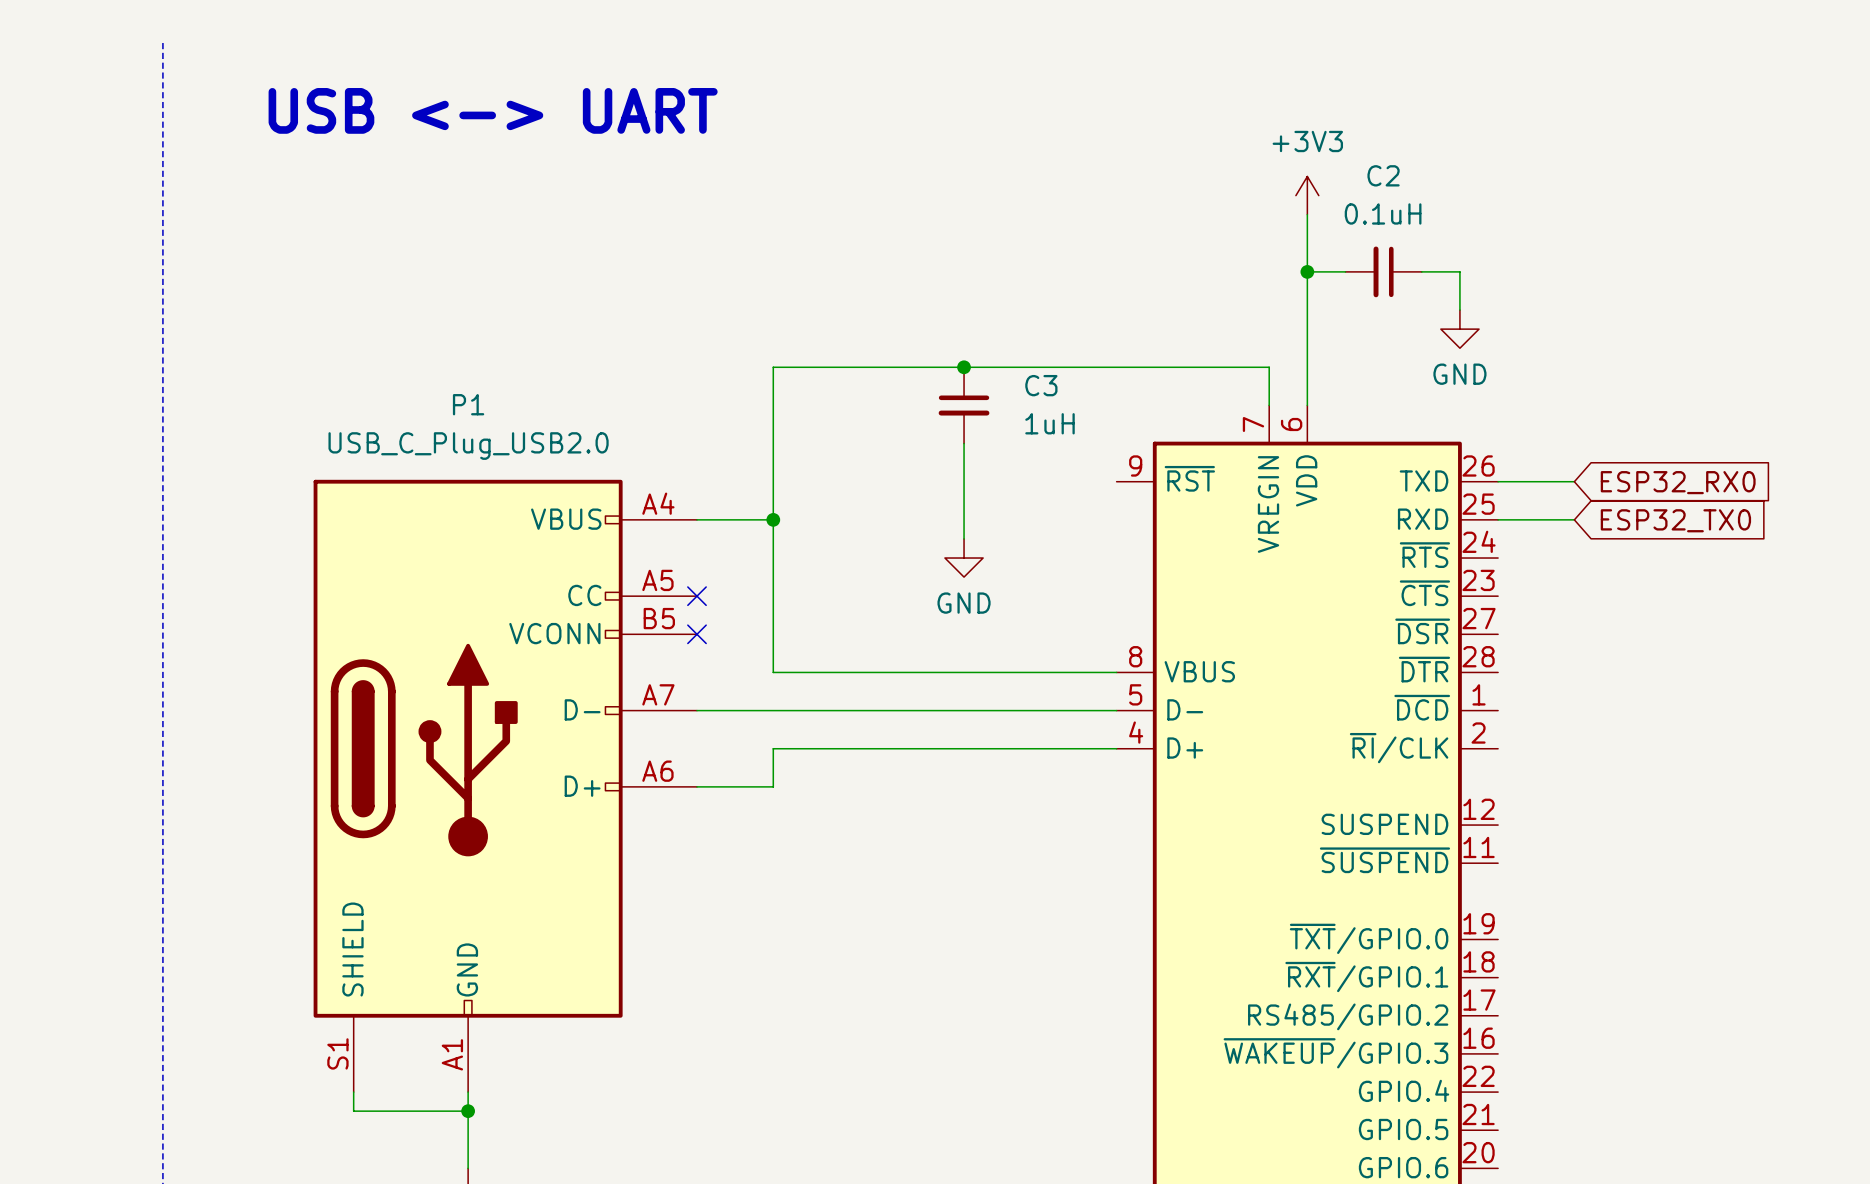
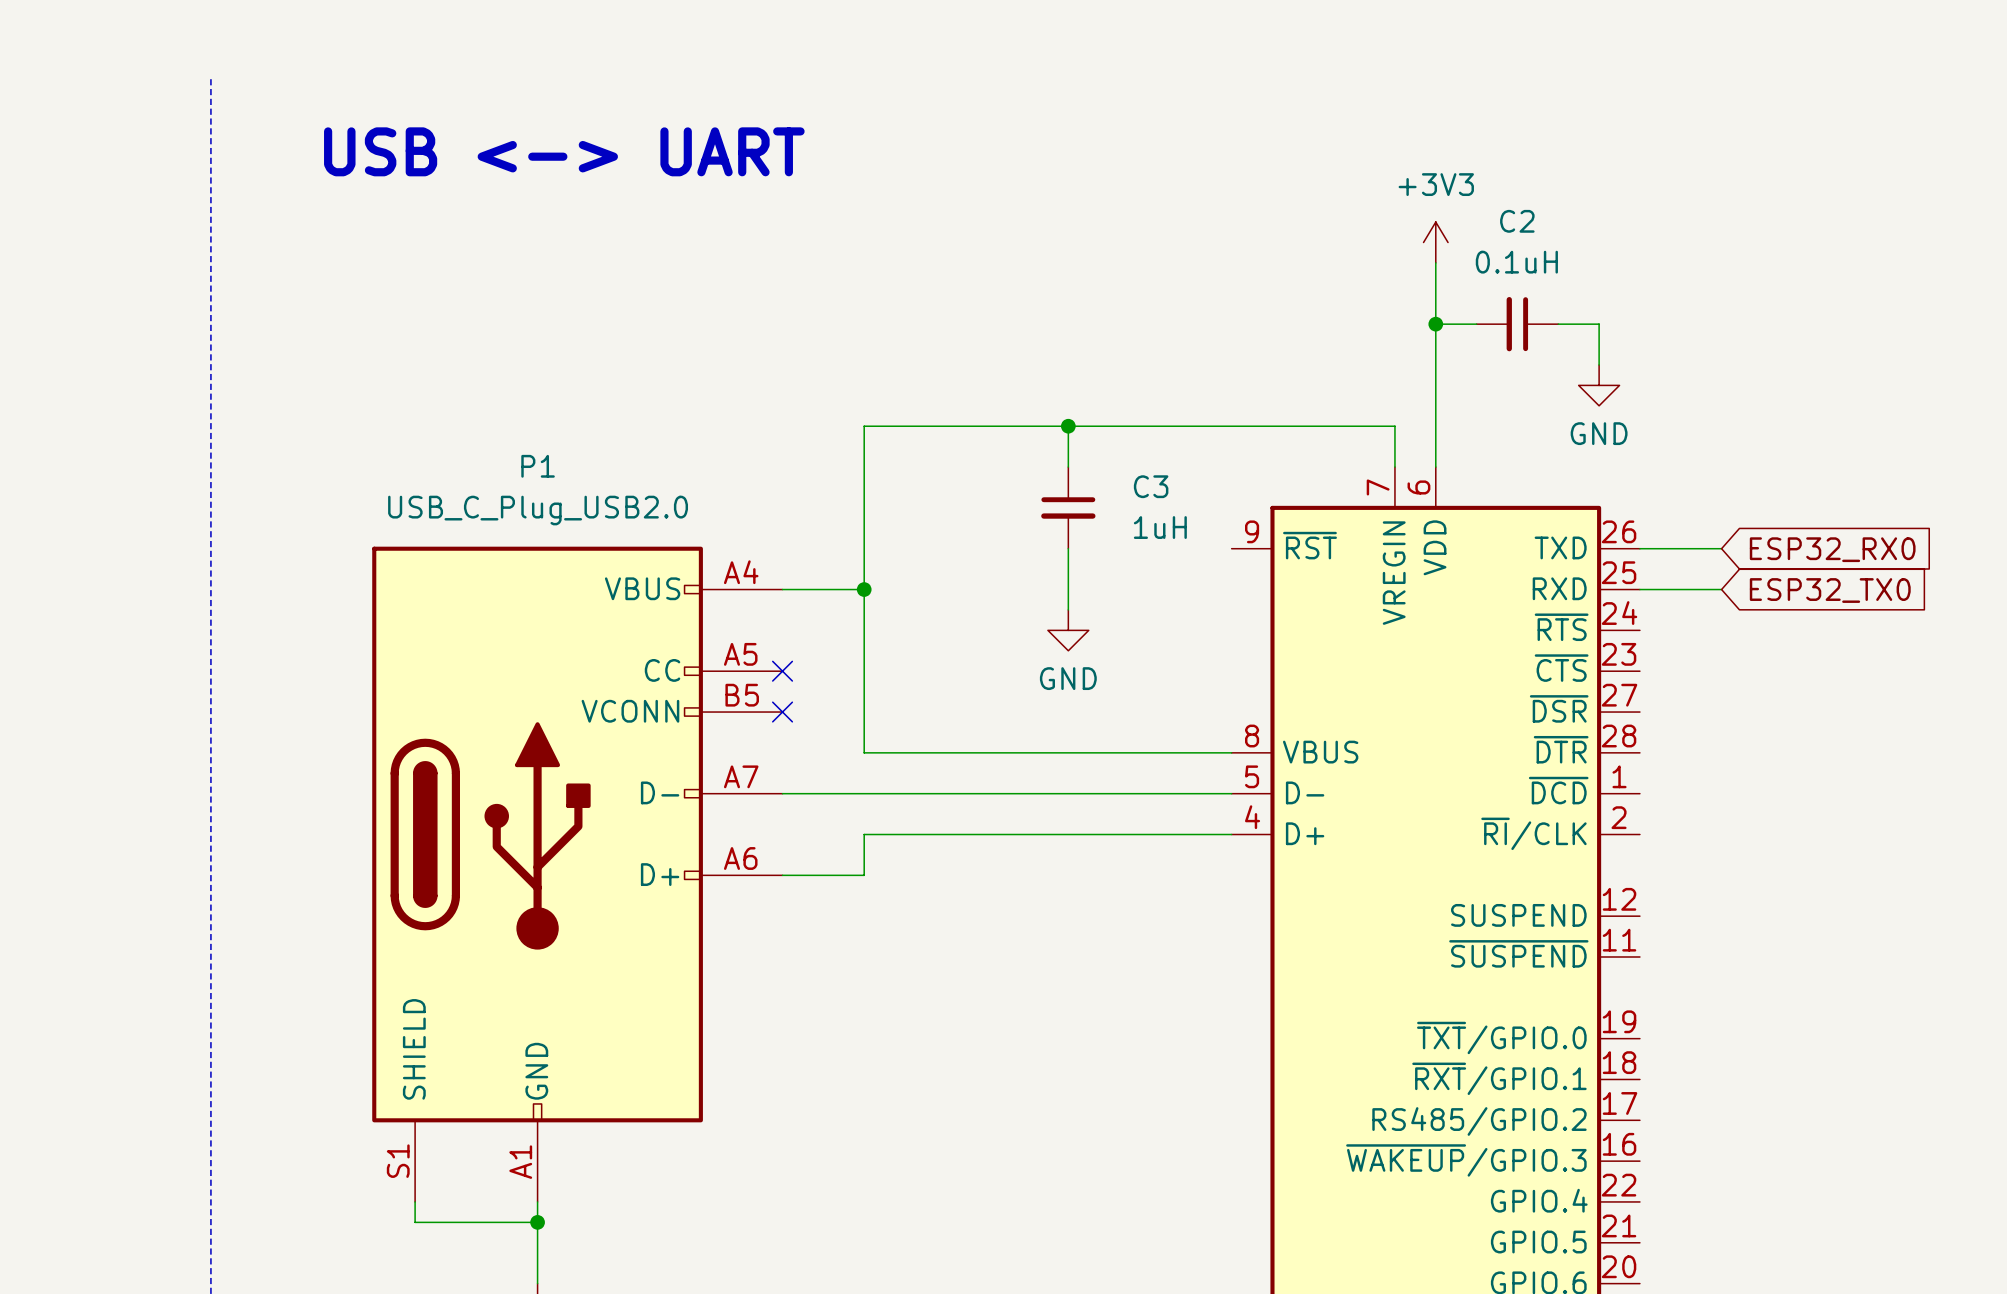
C3 position: (964, 405) -> (1068, 507)

